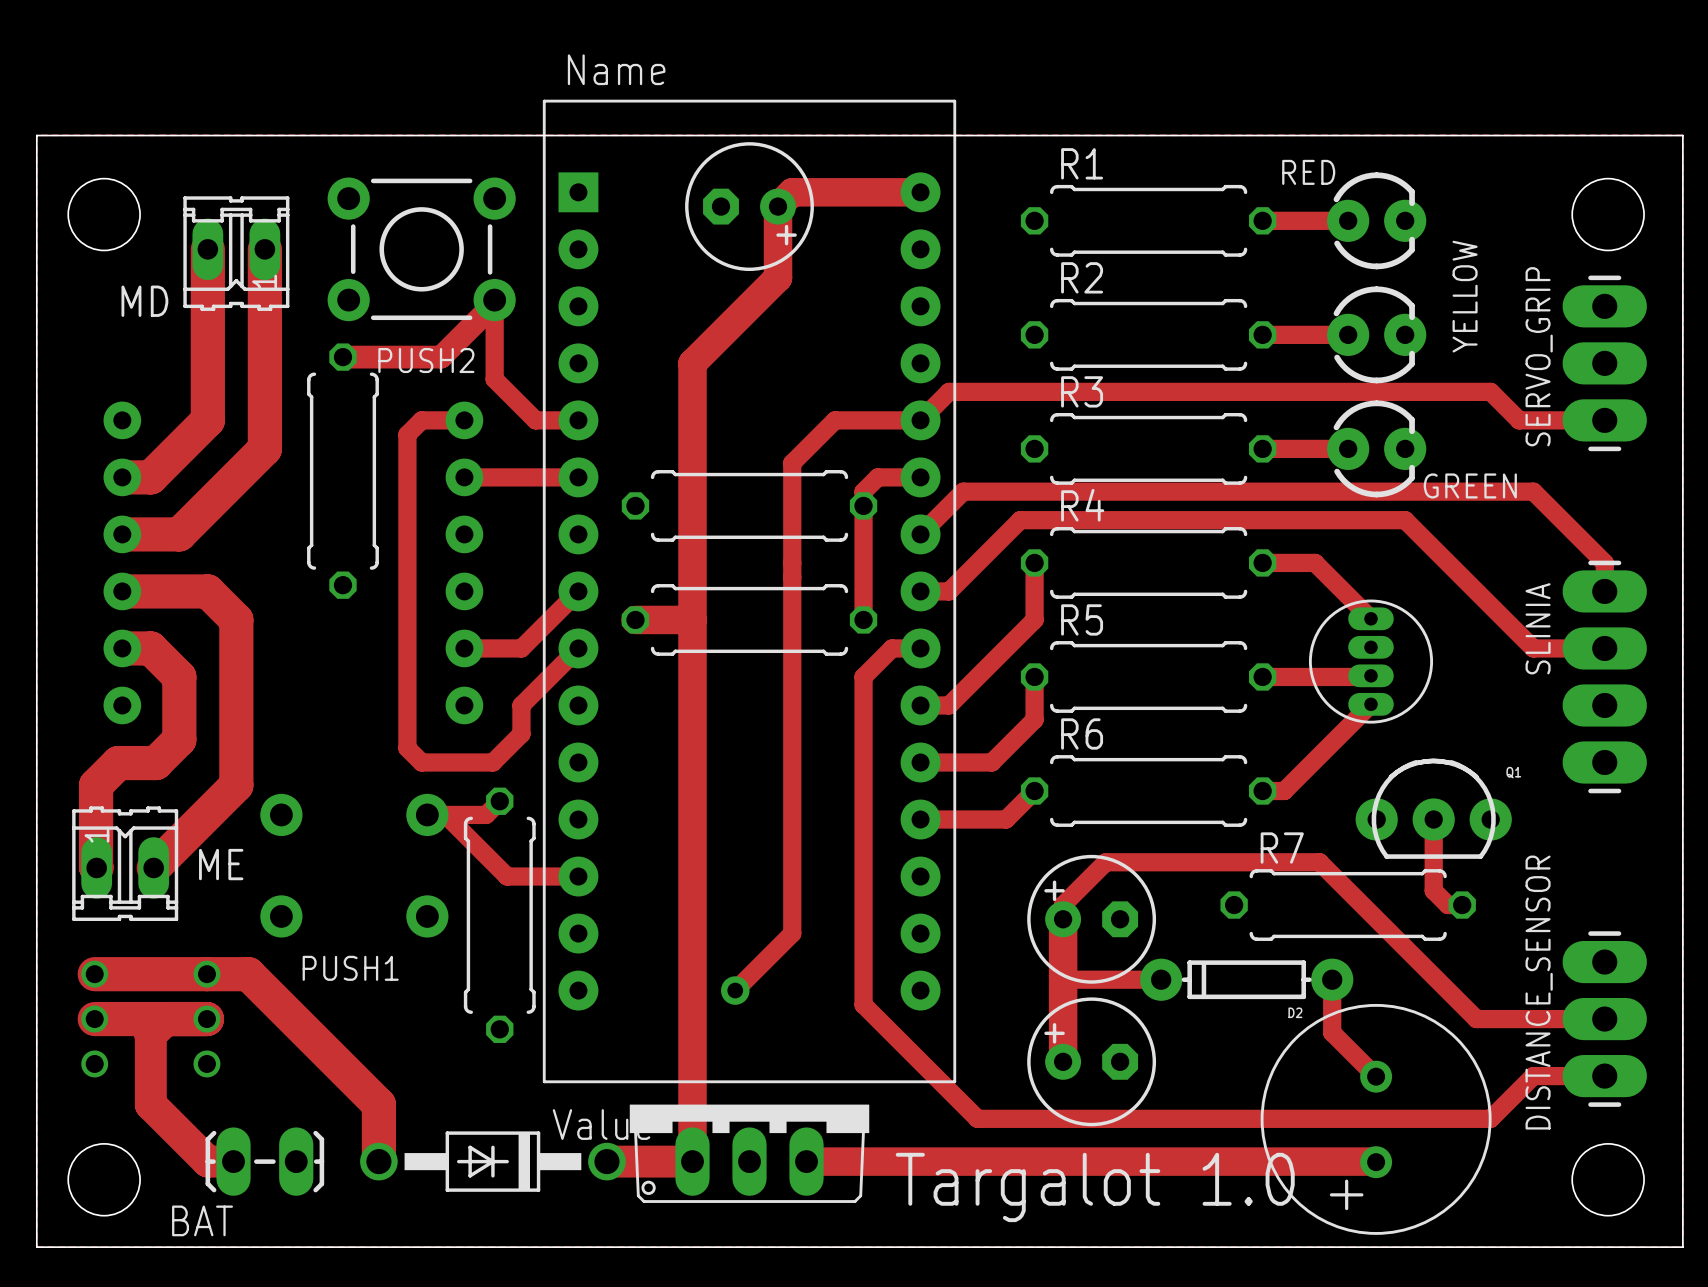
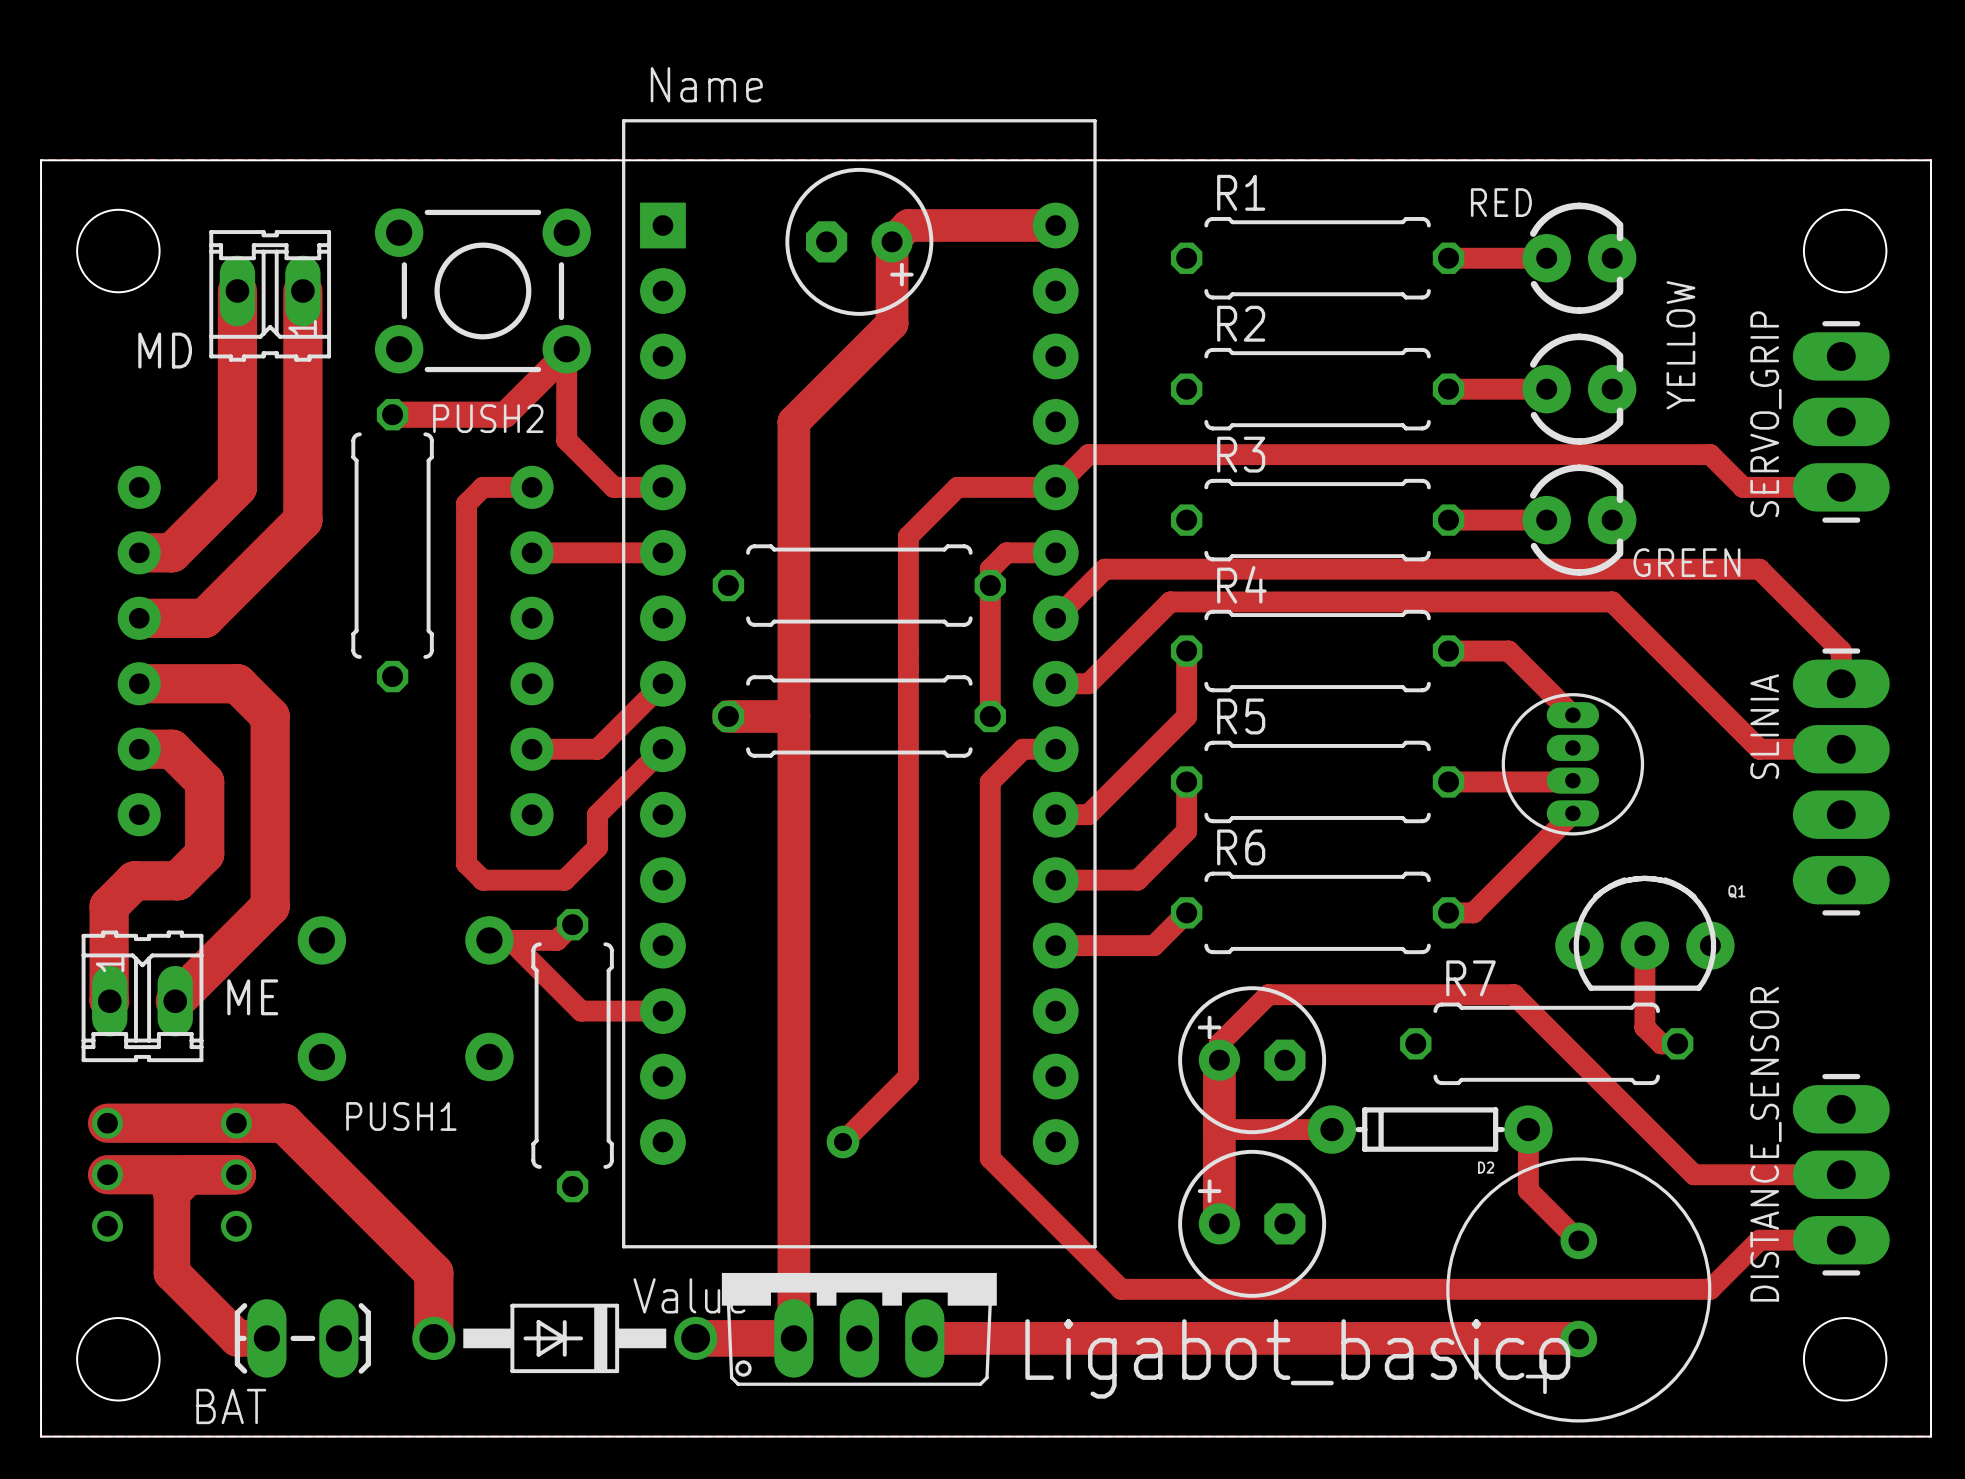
text: Targalot 1.0 (1095, 1187) -> Ligabot_basico (1297, 1358)

